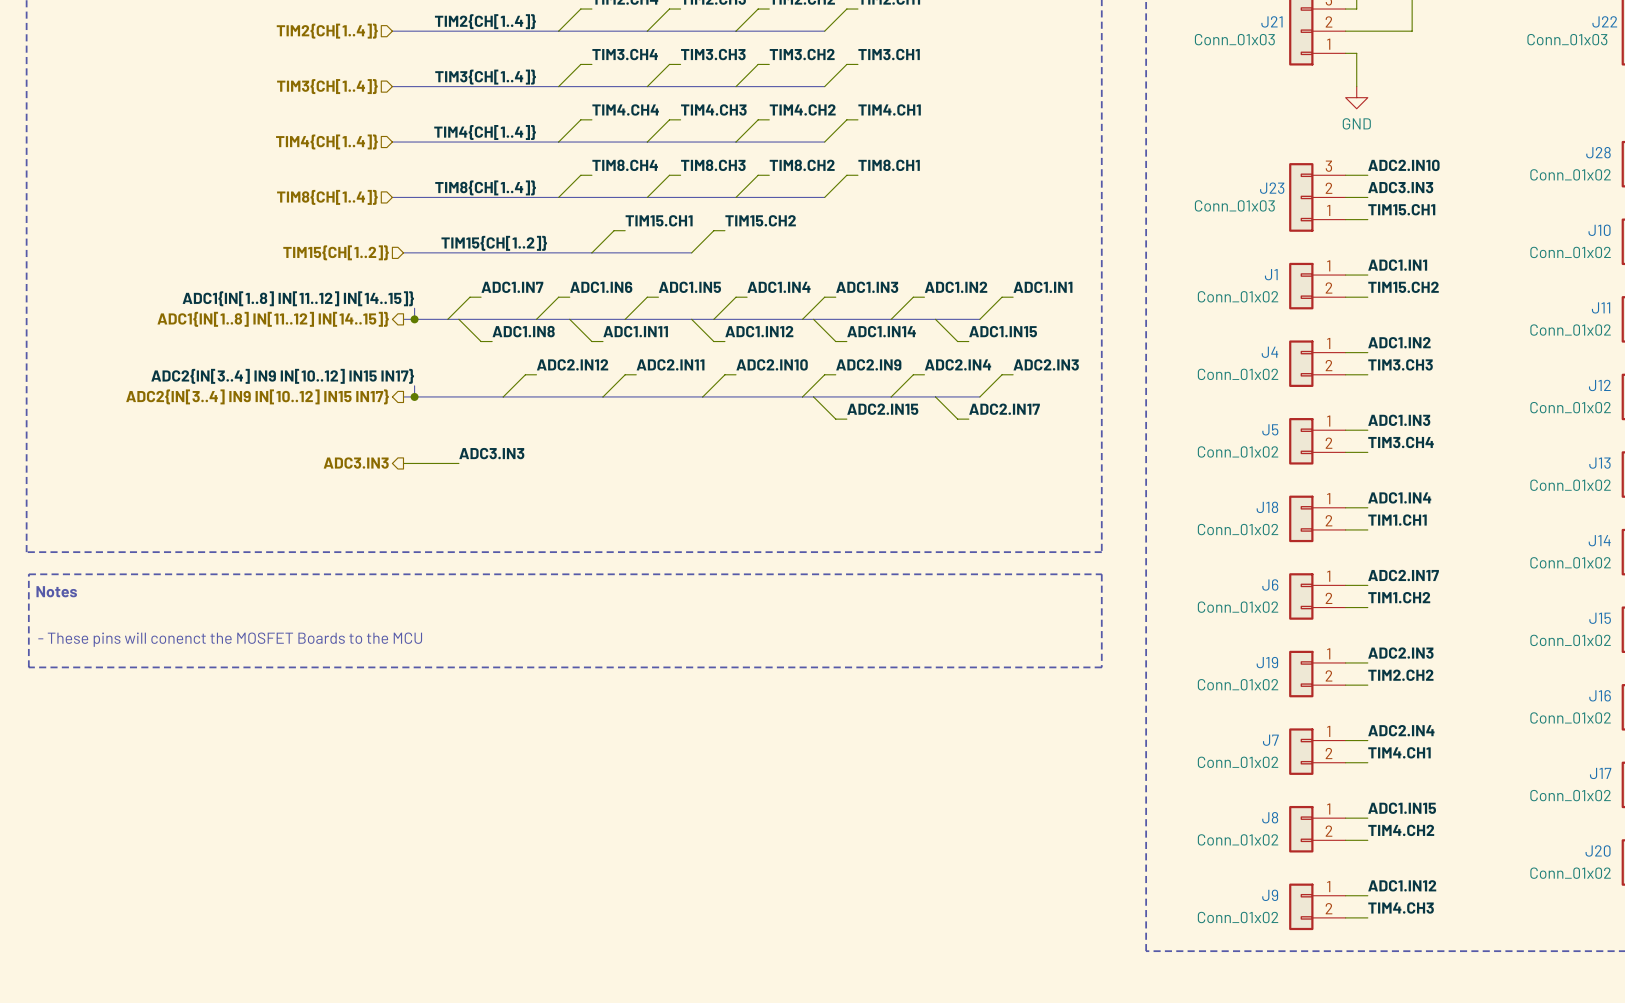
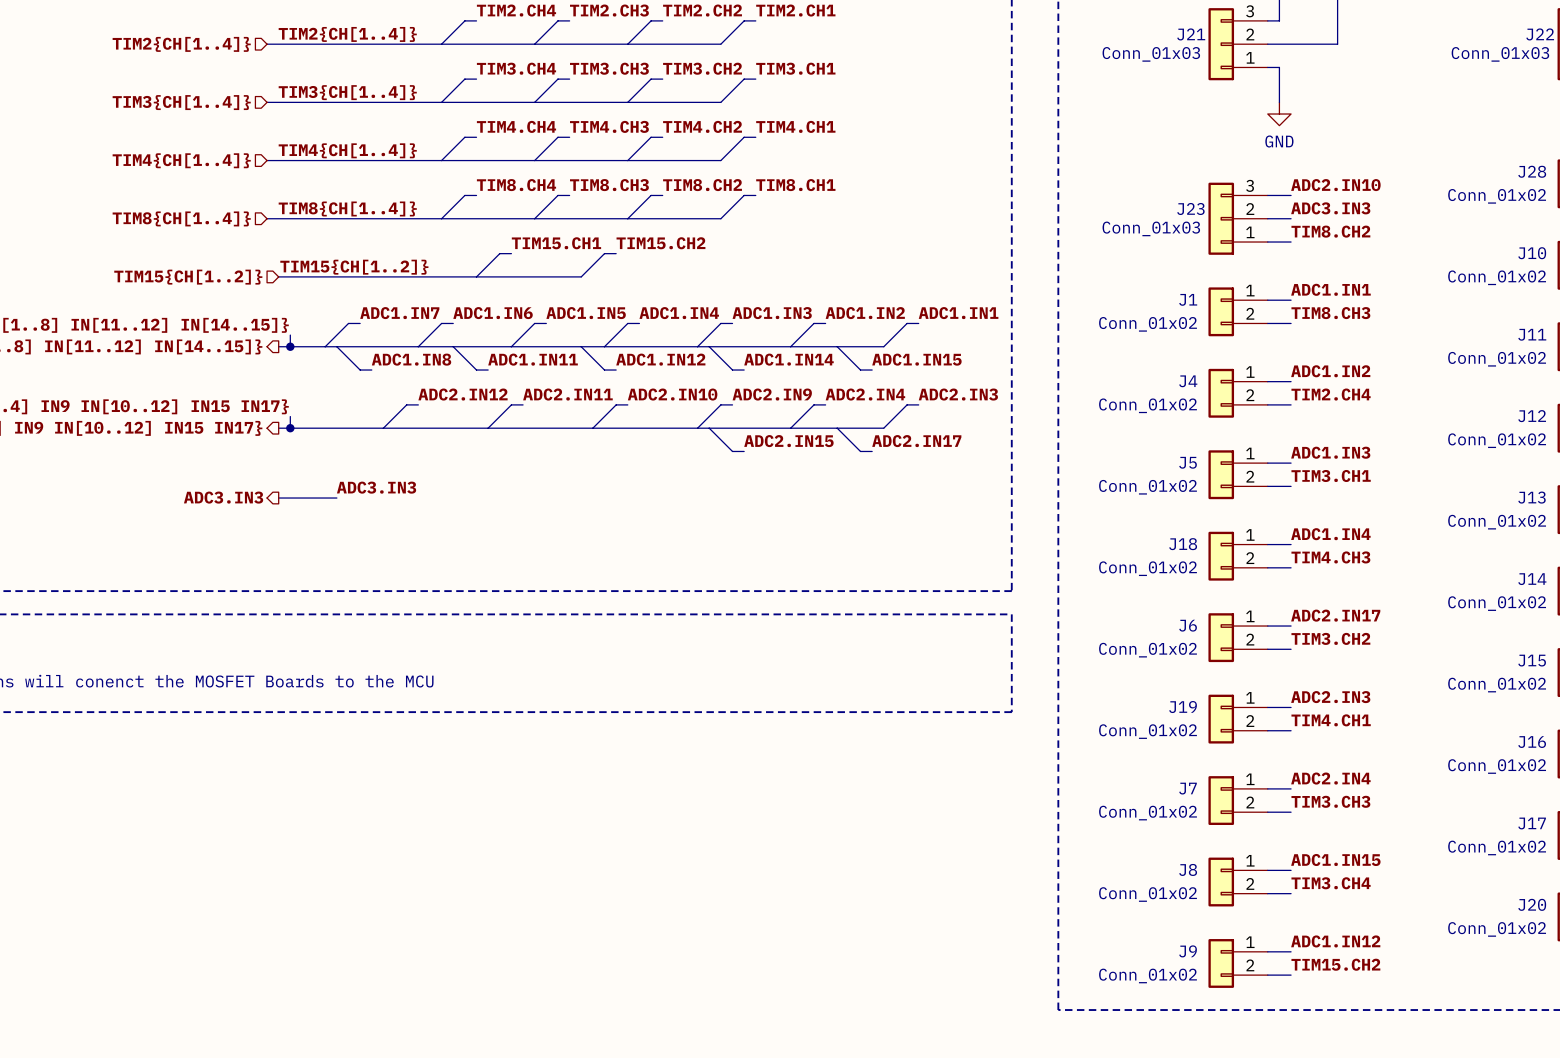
label: TIM15.CH1 (1401, 209) -> TIM8.CH2 (1330, 231)
label: TIM15.CH2 (1403, 287) -> TIM8.CH3 (1330, 313)
label: TIM3.CH3 (1400, 364) -> TIM2.CH4 (1331, 394)
label: TIM3.CH4 (1401, 442) -> TIM3.CH1 (1331, 475)
label: TIM1.CH1 (1397, 520) -> TIM4.CH3 (1330, 557)
label: TIM1.CH2 (1399, 597) -> TIM3.CH2 (1330, 638)
label: TIM2.CH2 (1400, 675) -> TIM4.CH1 (1331, 720)
label: TIM4.CH1 (1399, 752) -> TIM3.CH3 (1330, 801)
label: TIM4.CH2 (1401, 830) -> TIM3.CH4 (1331, 883)
label: TIM4.CH3 (1401, 908) -> TIM15.CH2 (1335, 964)

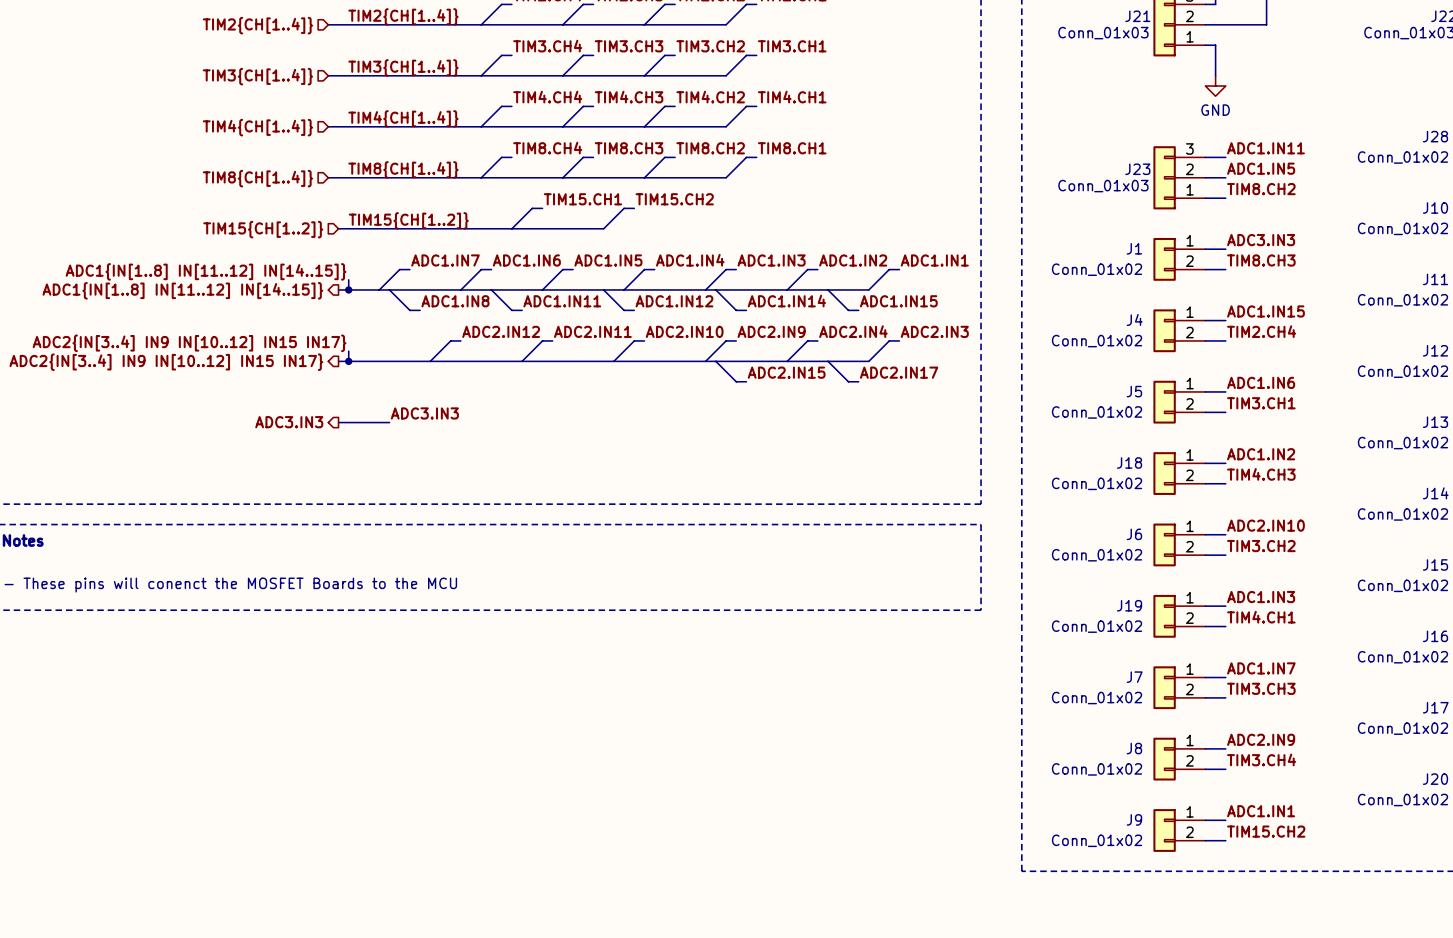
label: ADC2.IN10 (1335, 185) -> ADC1.IN11 (1265, 148)
label: ADC3.IN3 (1330, 208) -> ADC1.IN5 (1261, 168)
label: ADC1.IN1 (1330, 289) -> ADC3.IN3 (1261, 240)
label: ADC1.IN2 (1330, 371) -> ADC1.IN15 (1265, 311)
label: ADC1.IN3 (1330, 452) -> ADC1.IN6 (1261, 382)
label: ADC1.IN4 (1330, 534) -> ADC1.IN2 (1261, 454)
label: ADC2.IN17 (1335, 615) -> ADC2.IN10 (1265, 525)
label: ADC2.IN3 (1330, 697) -> ADC1.IN3 (1261, 597)
label: ADC2.IN4 (1330, 778) -> ADC1.IN7 (1261, 668)
label: ADC1.IN15 (1335, 859) -> ADC2.IN9 (1261, 739)
label: ADC1.IN12 (1335, 941) -> ADC1.IN1 (1261, 811)

